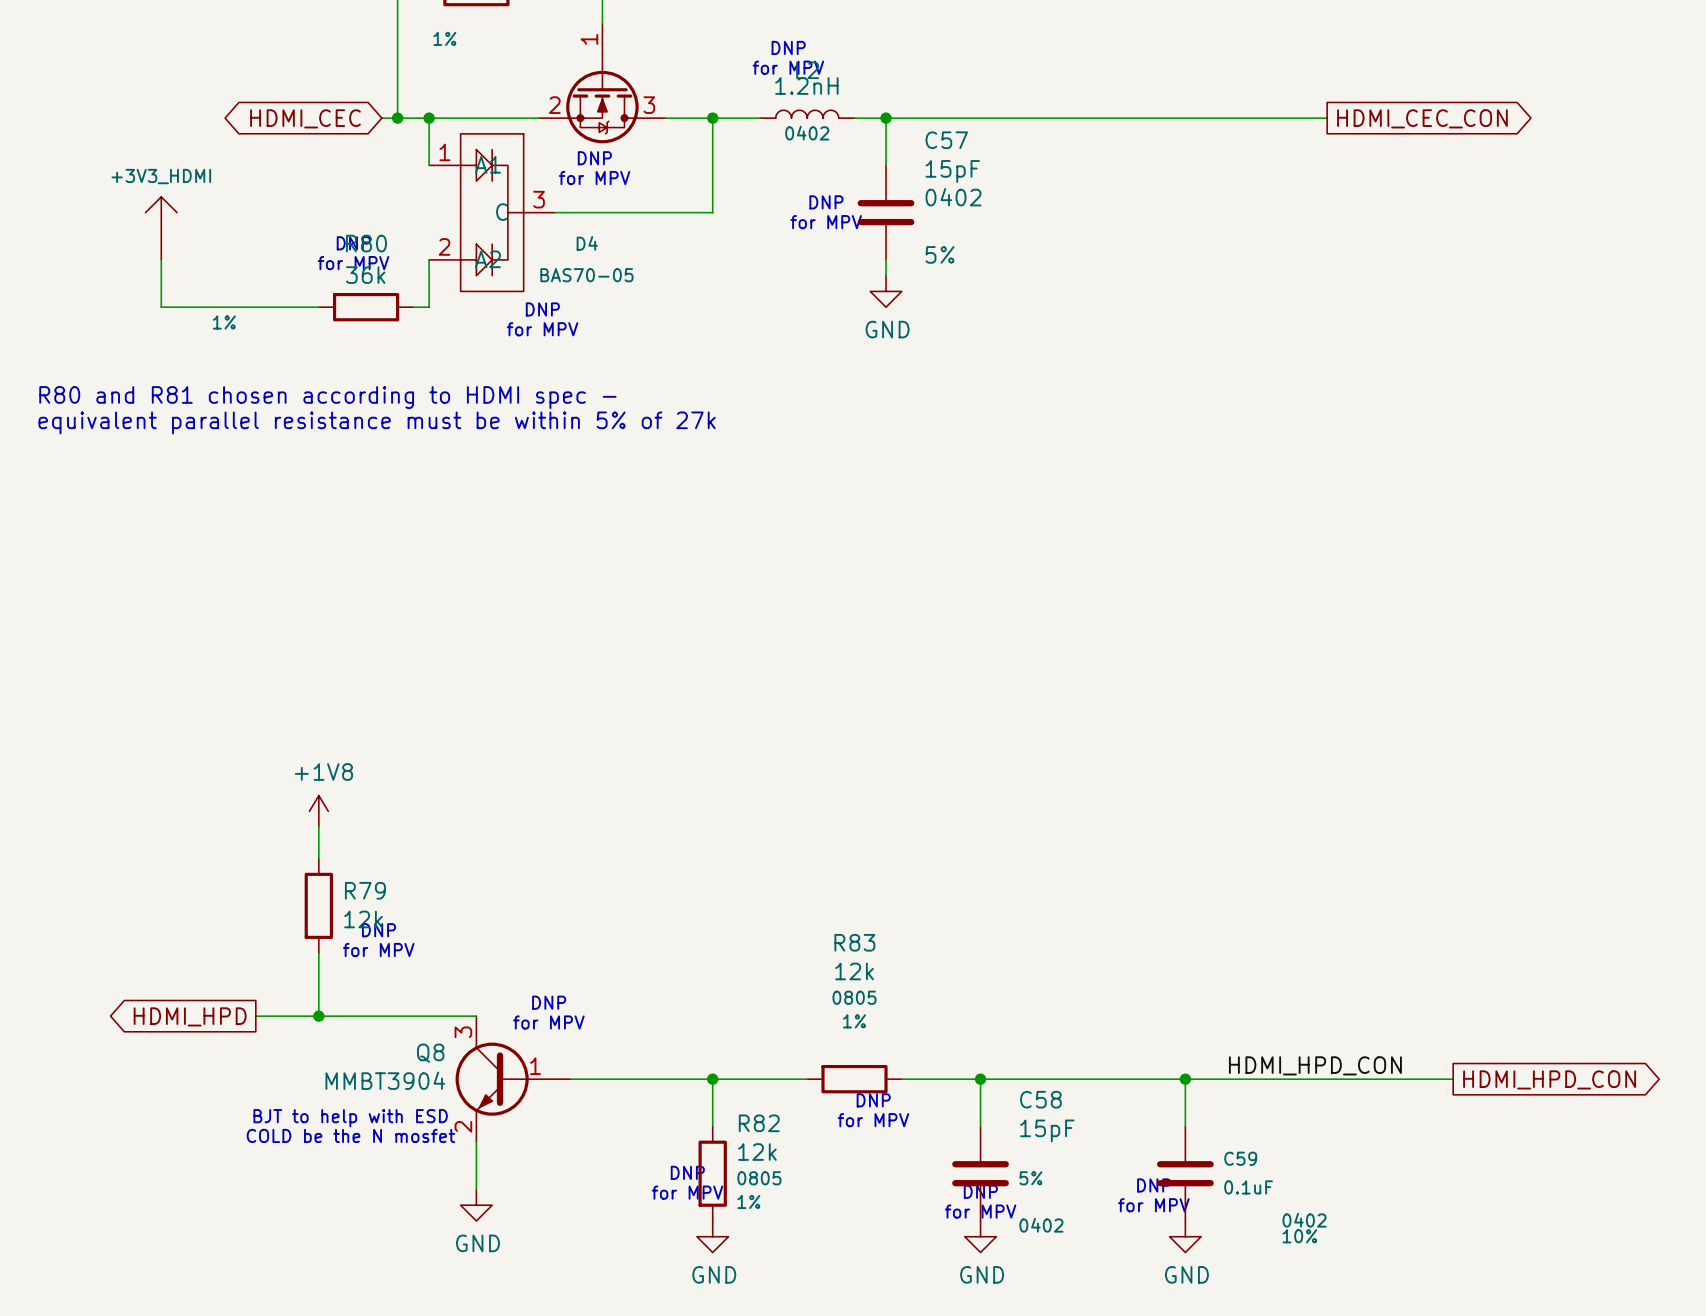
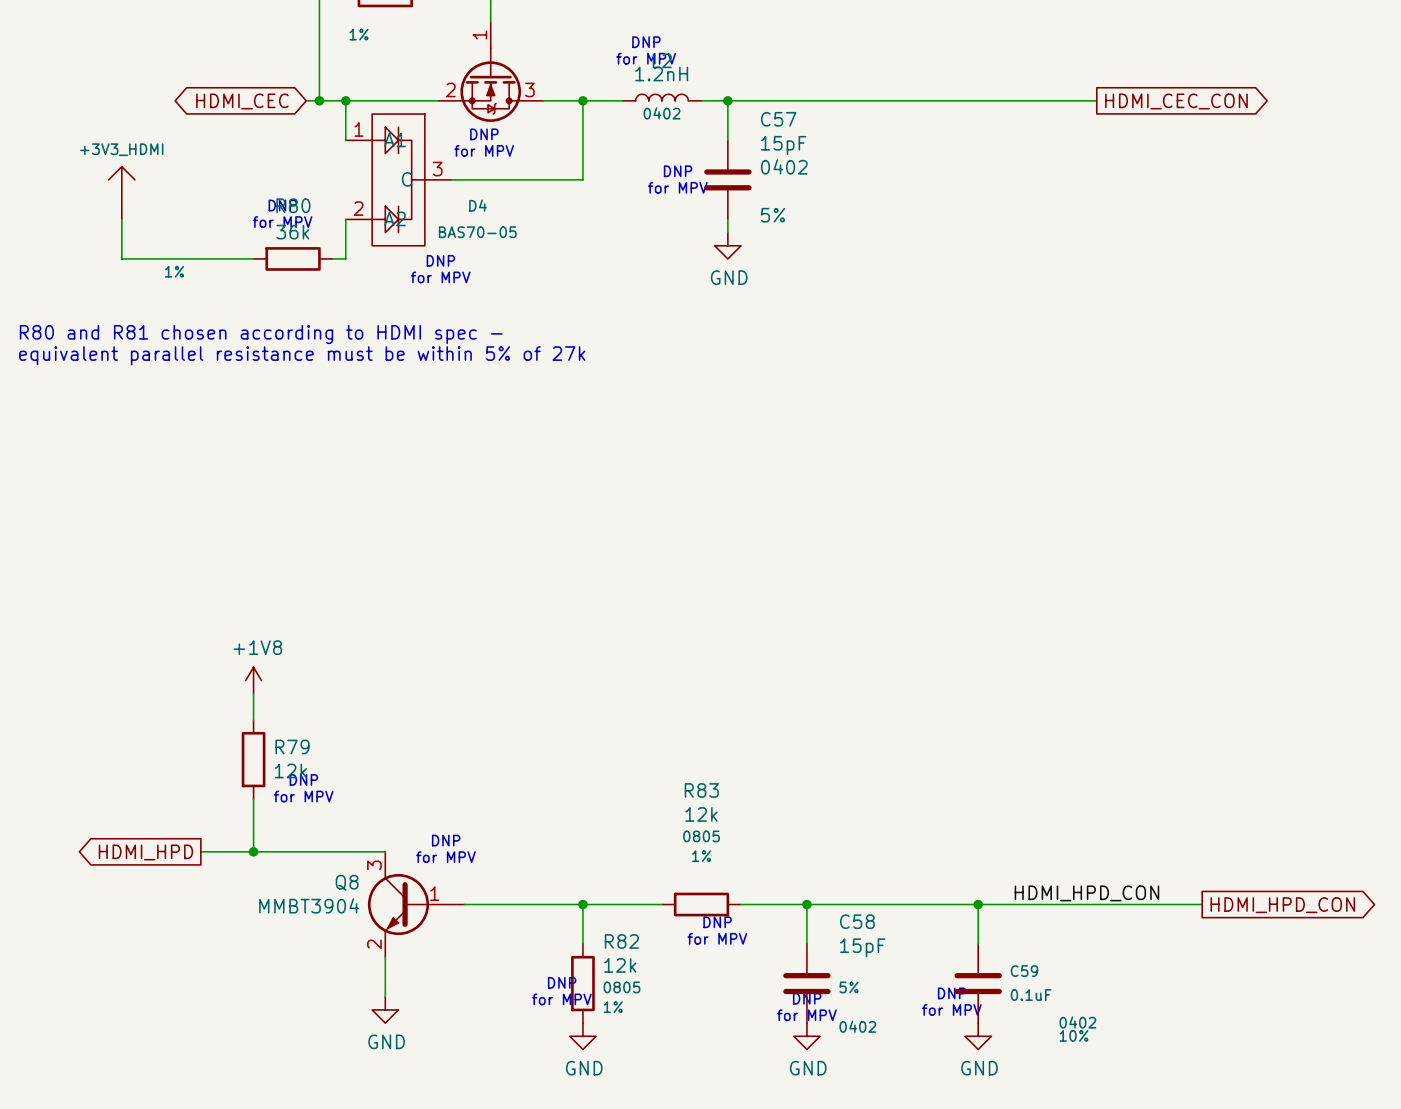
text: BJT to help with ESD (350, 1118) -> none
text: COLD be the N mosfet (350, 1135) -> none

